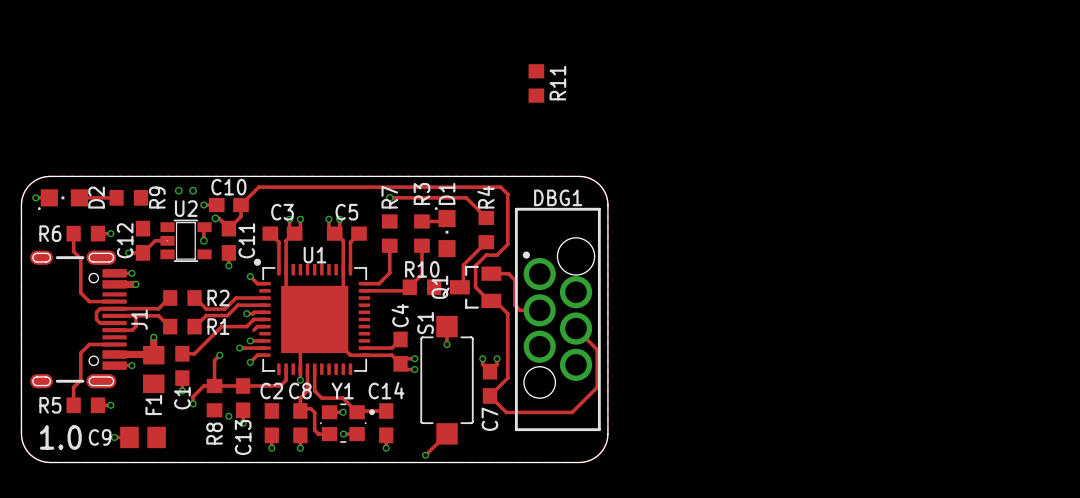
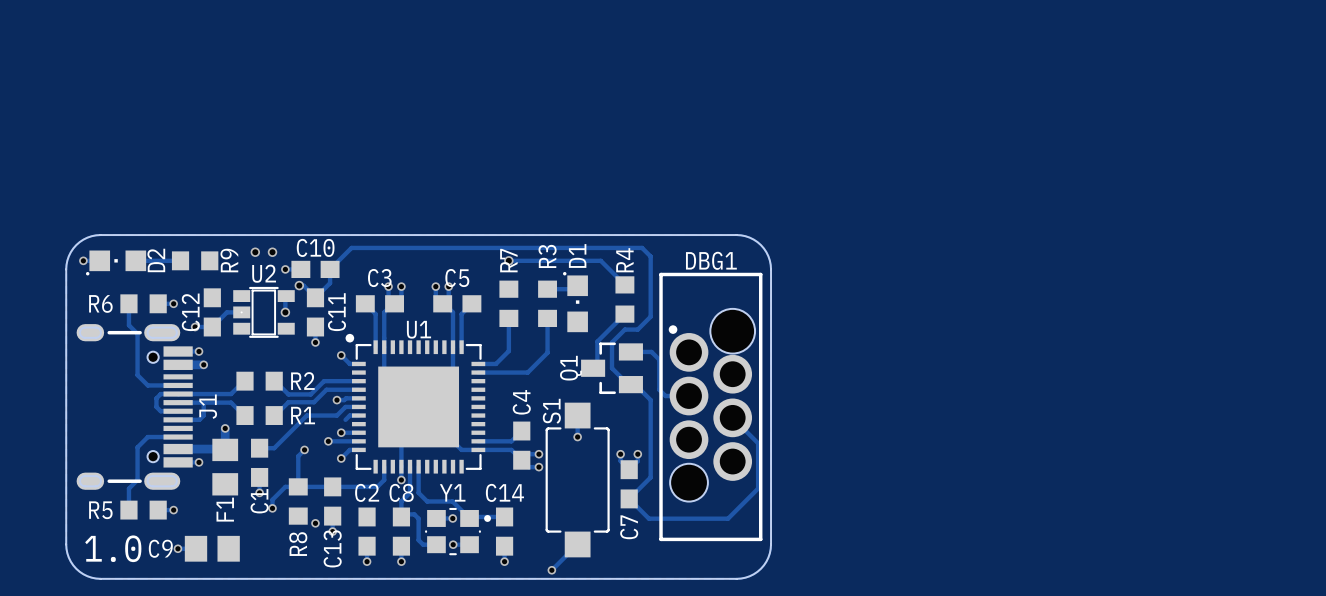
R11: (536, 83) -> none
R10: (421, 287) -> none

